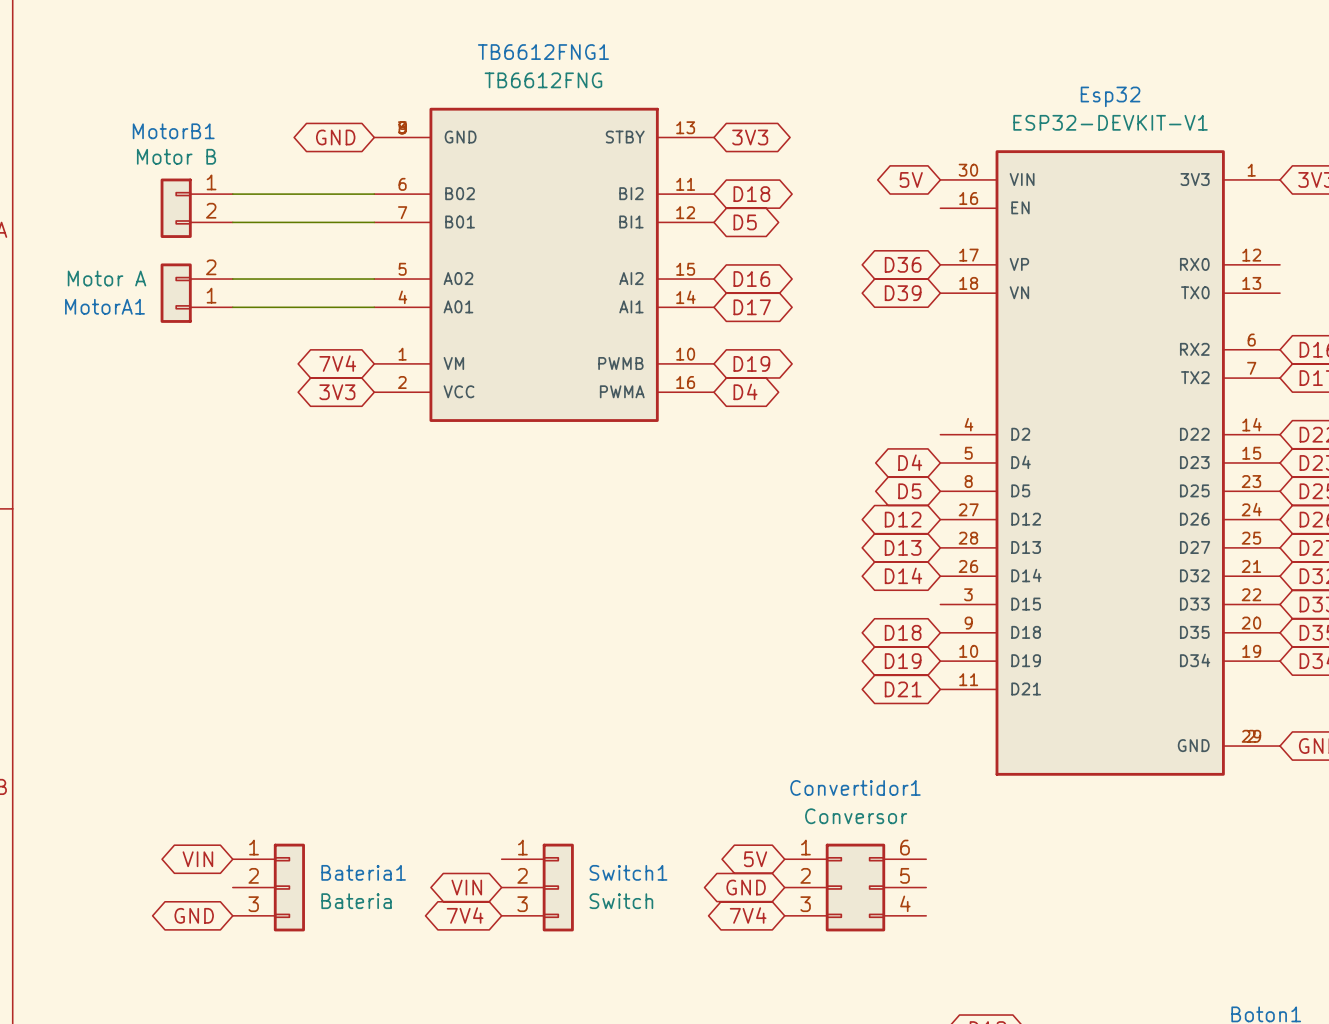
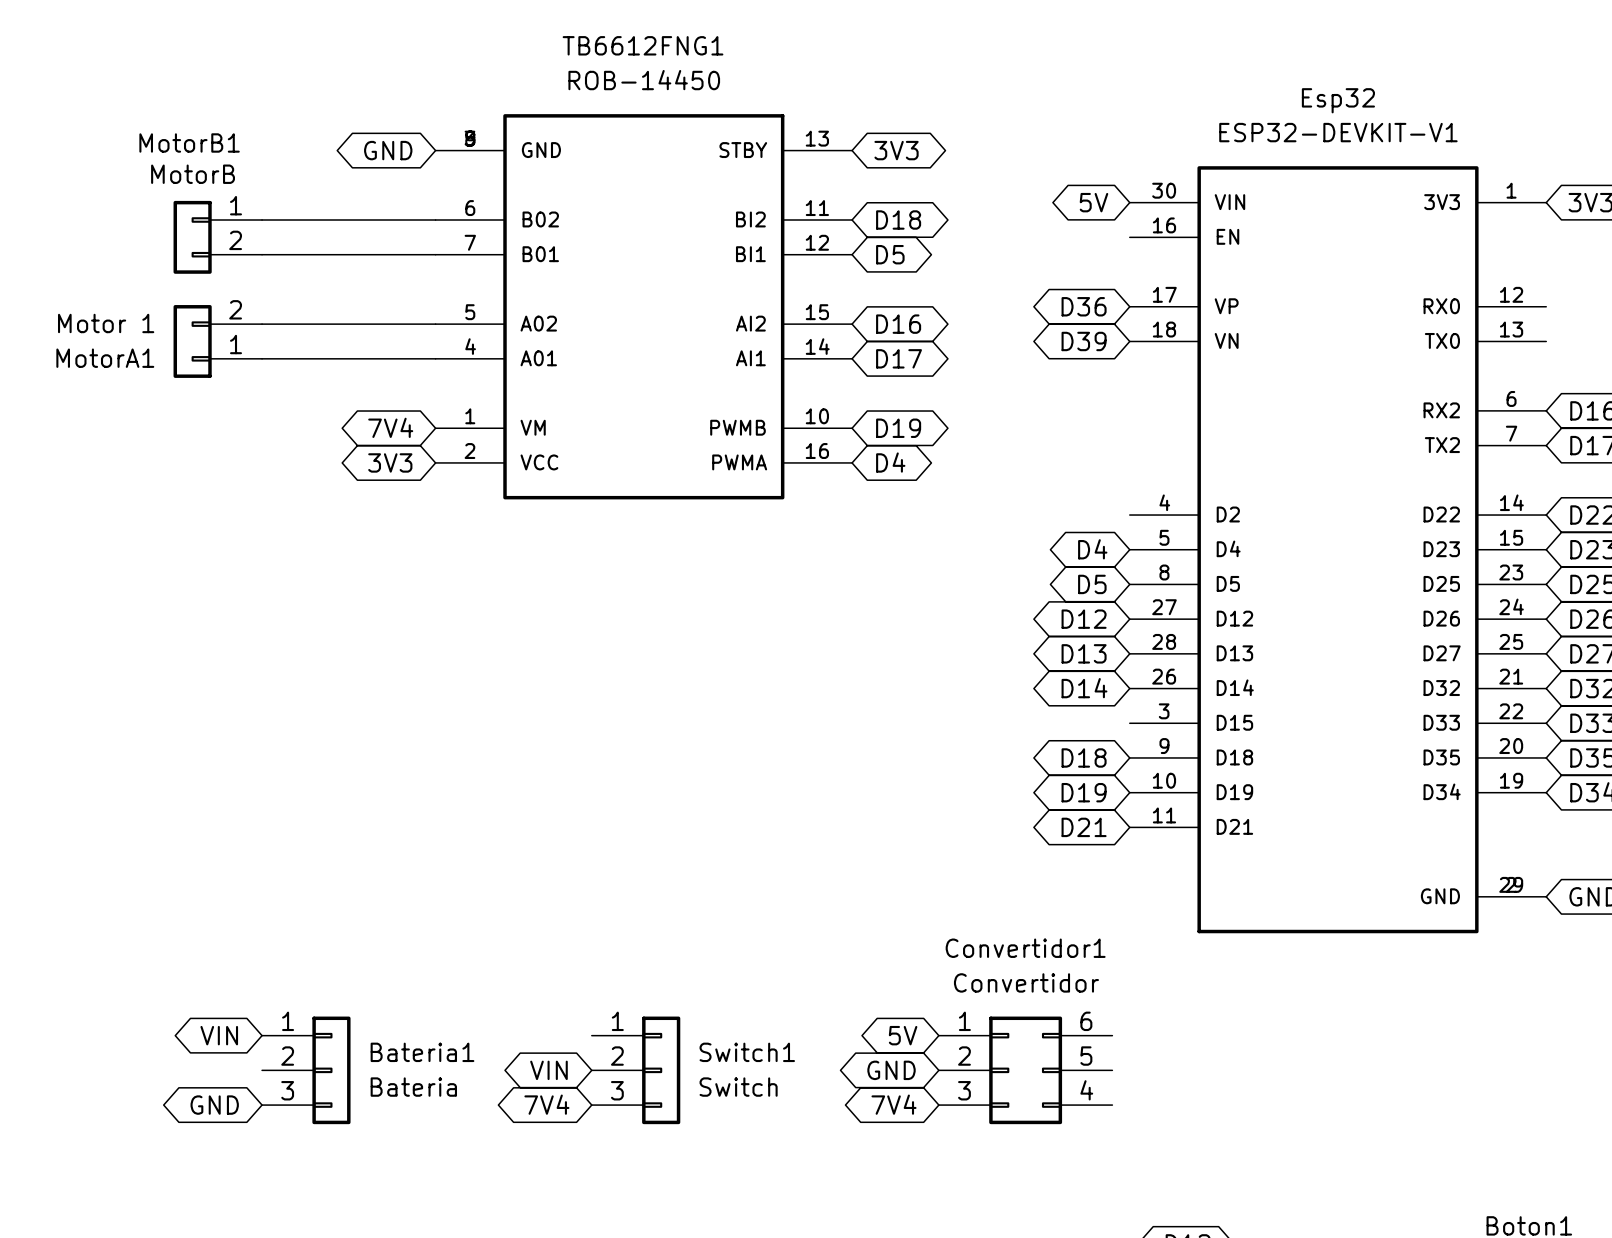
TB6612FNG1 value: TB6612FNG (543, 80) -> ROB-14450 (644, 80)
MotorB1 value: Motor B (176, 156) -> MotorB (193, 174)
MotorA1 value: Motor A (107, 278) -> Motor 1 (106, 323)
Convertidor1 value: Conversor (856, 816) -> Convertidor (1026, 982)

